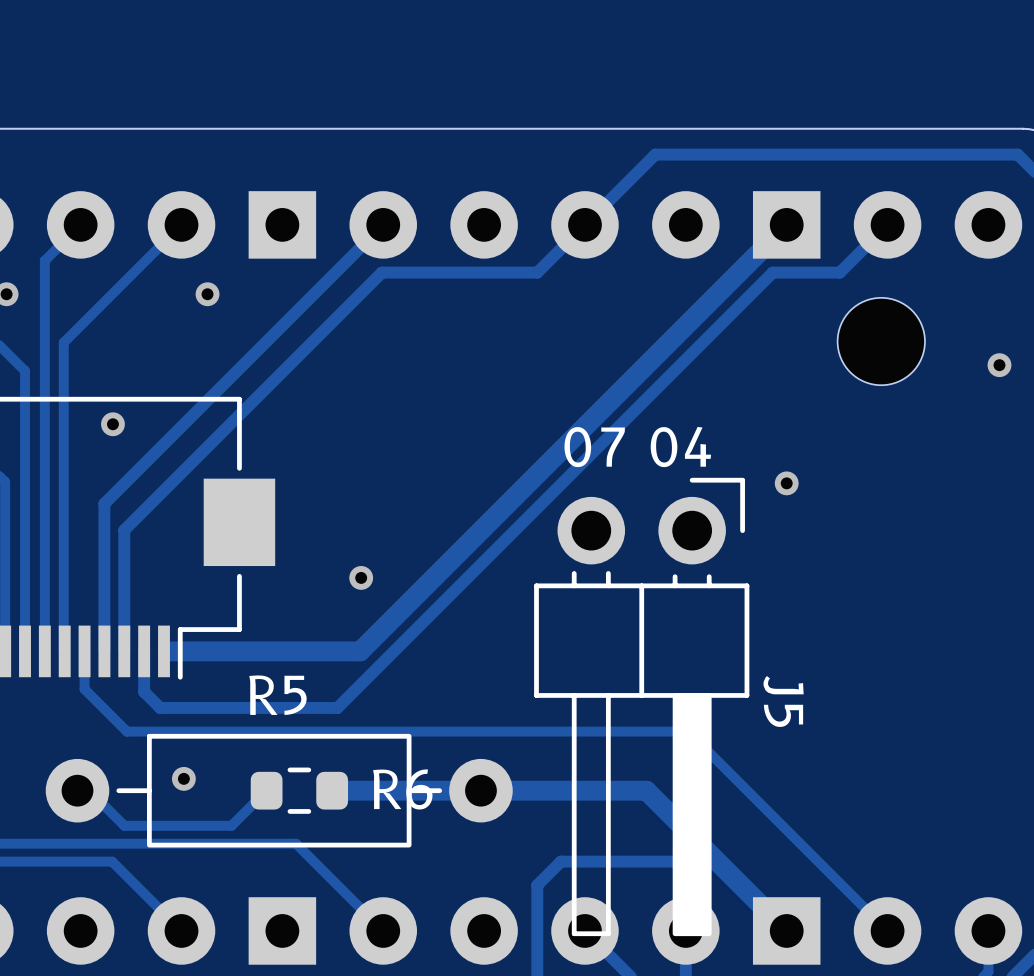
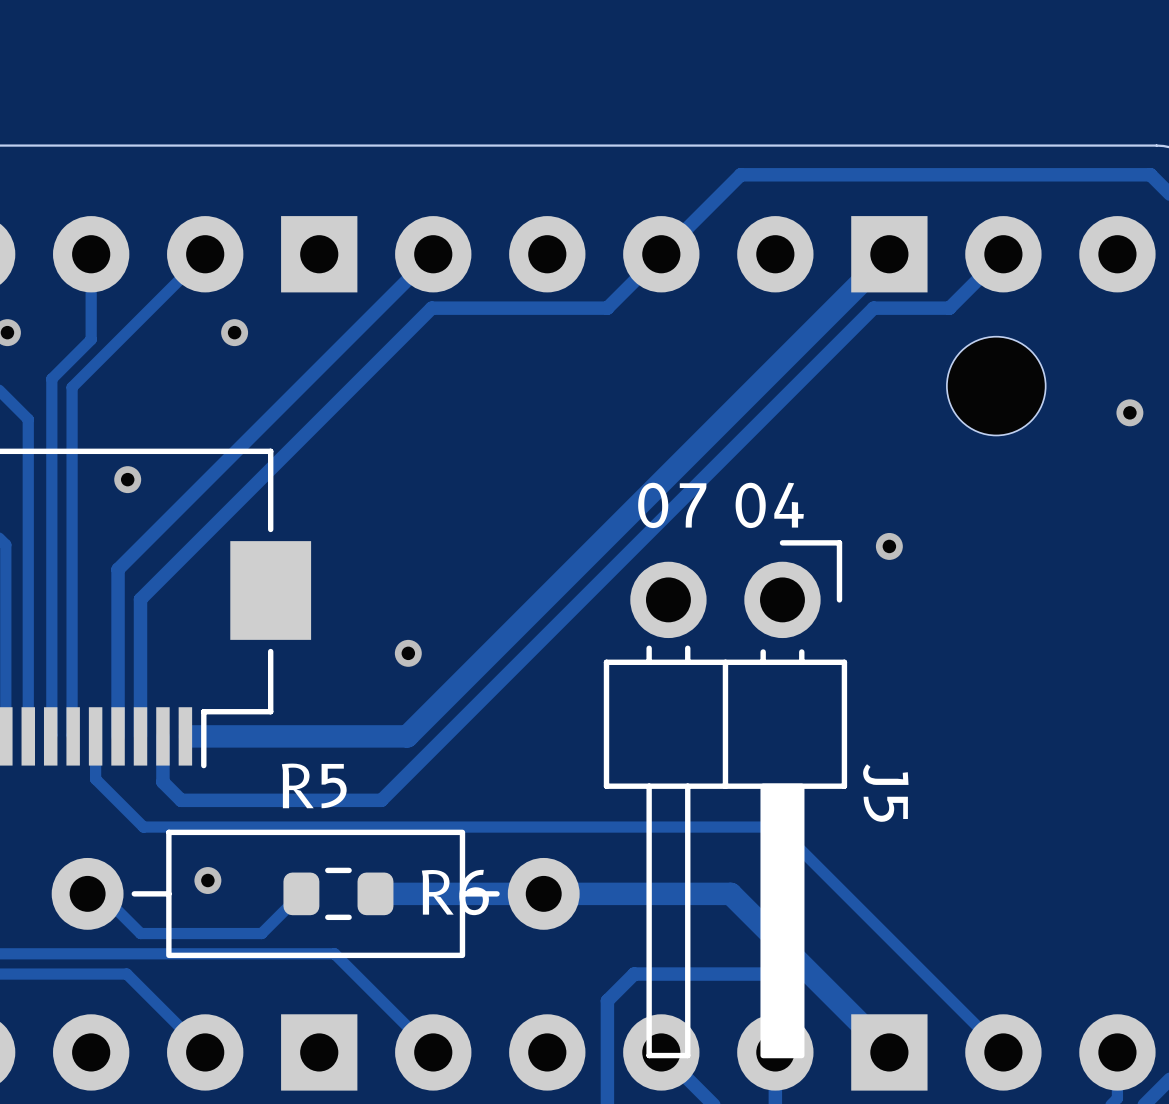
track: (80, 224) (44, 260) (44, 651) -> (91, 254) (91, 339) (51, 378) (50, 736)

